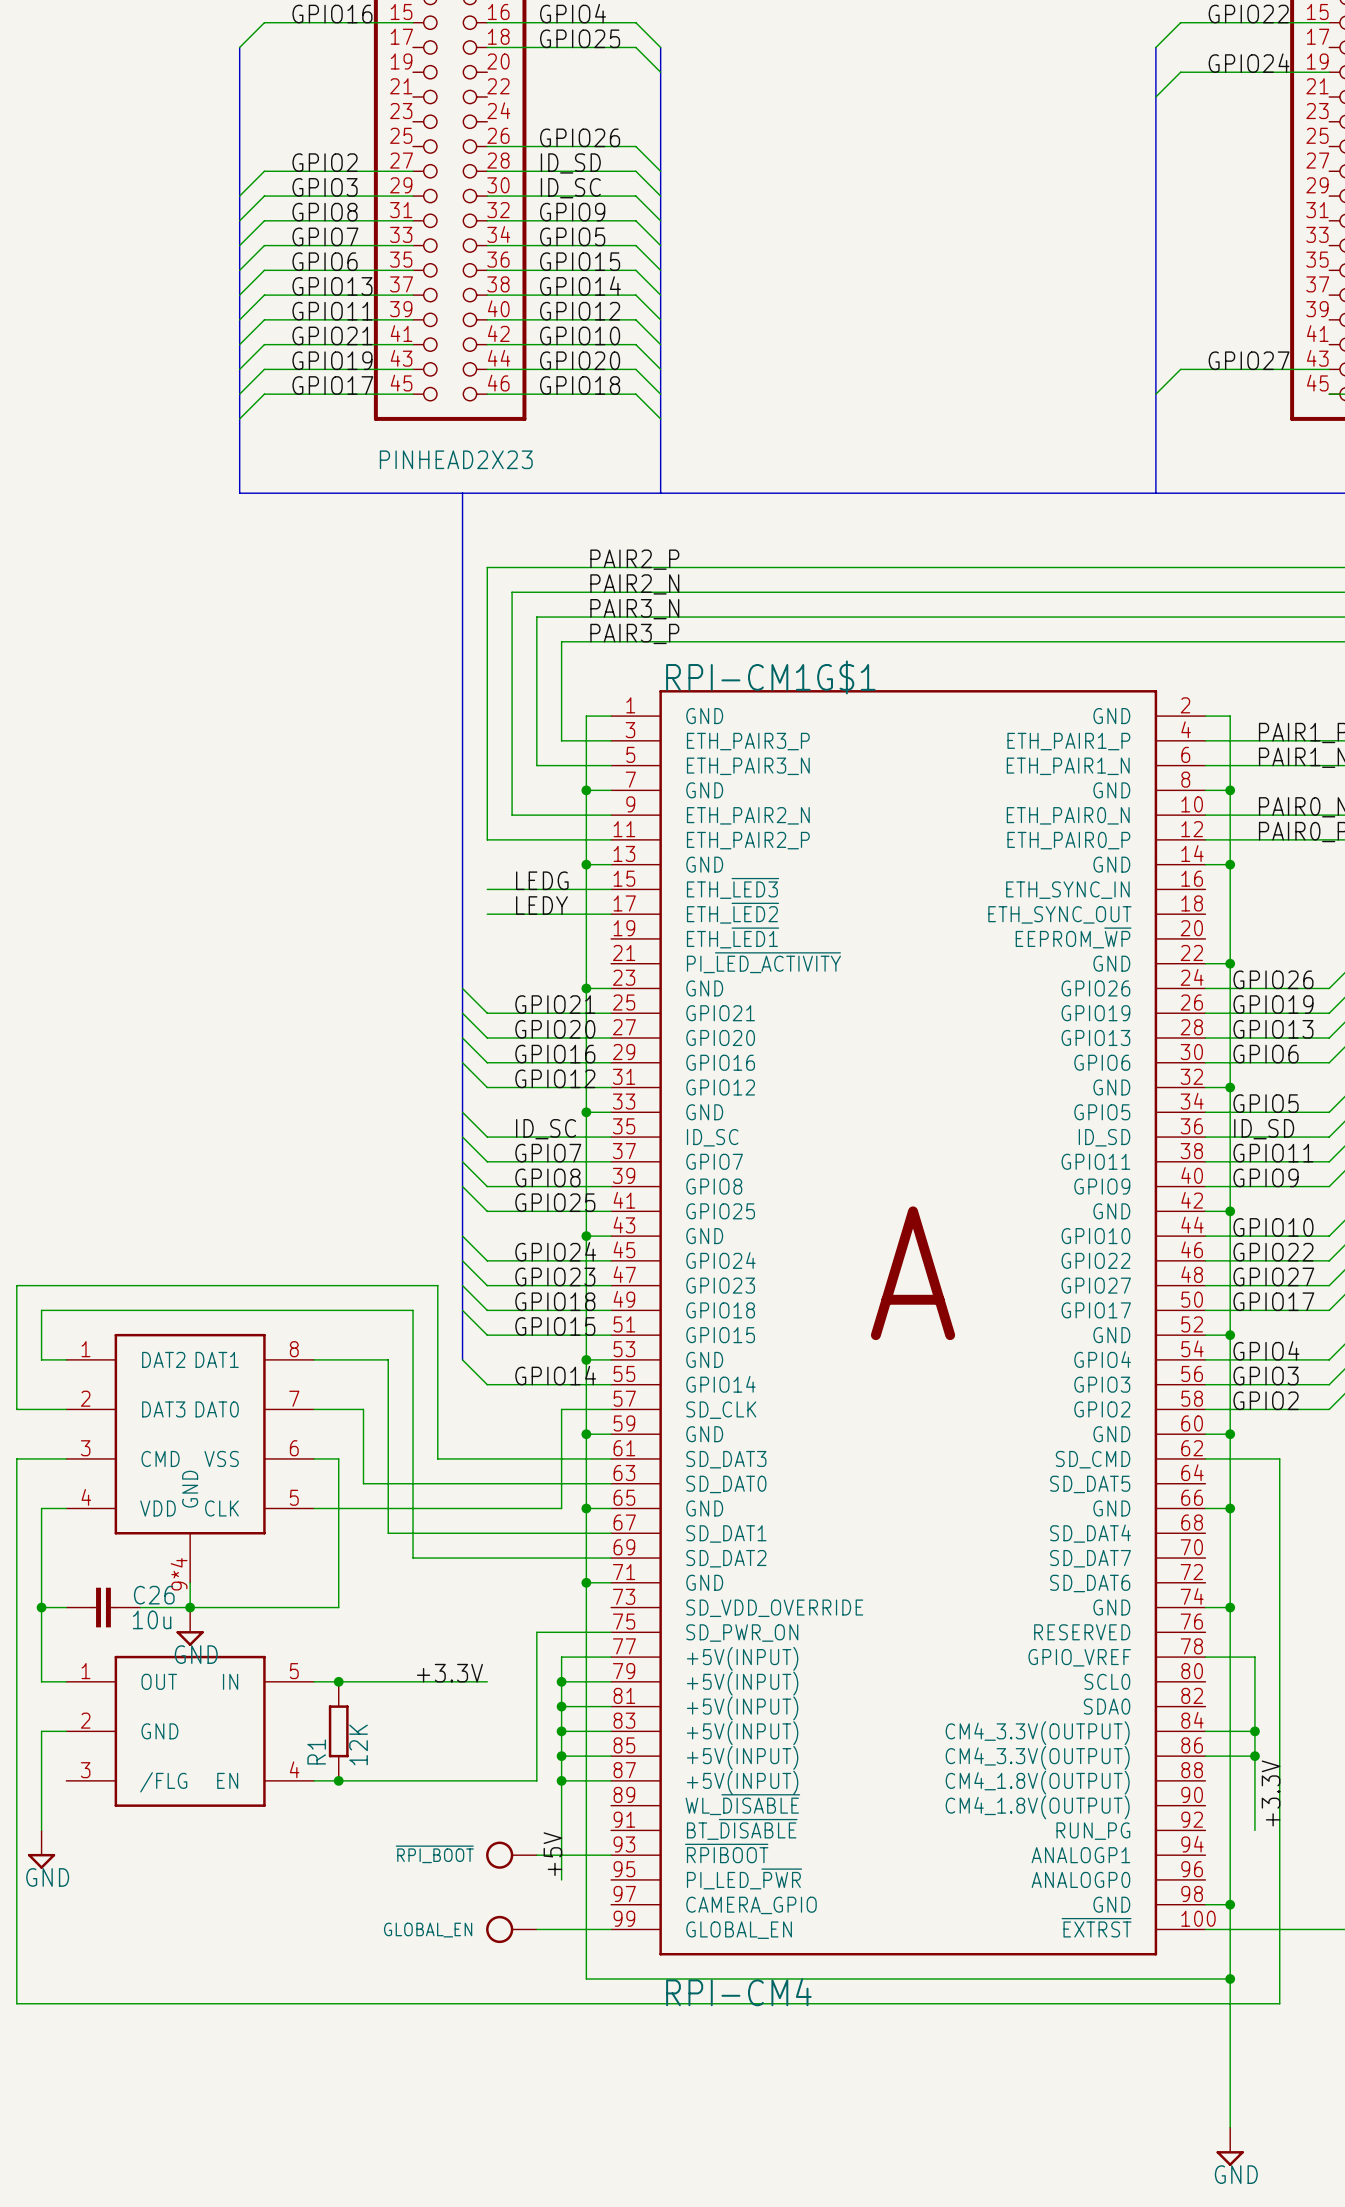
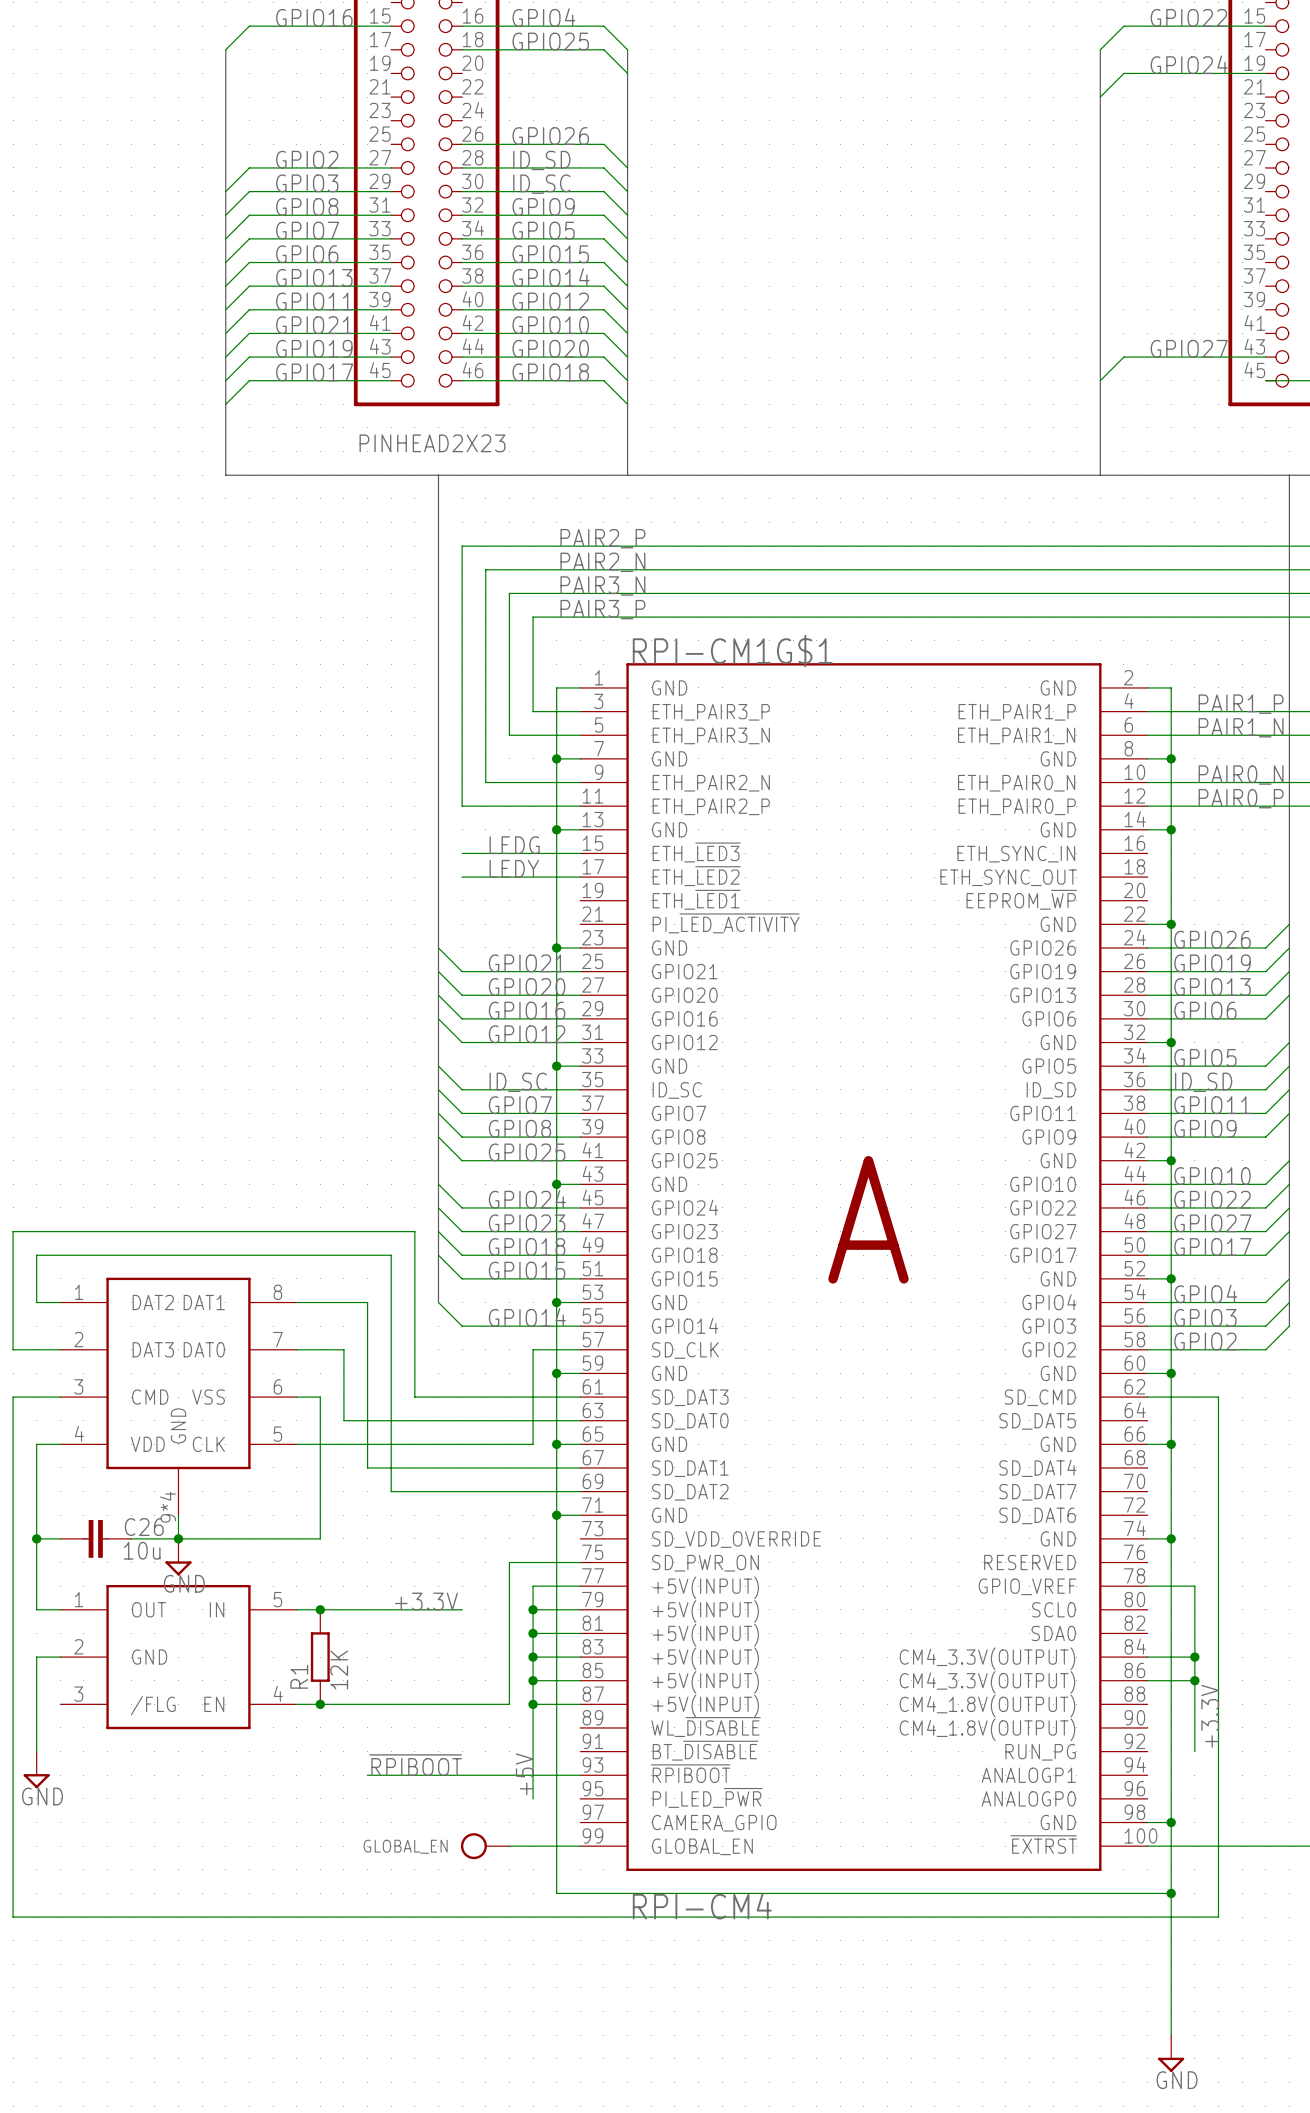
label: none -> ~{RPIBOOT} (415, 1765)
wire: none -> (367, 1775) (509, 1775)
~{RPI_BOOT}: (511, 1855) -> none

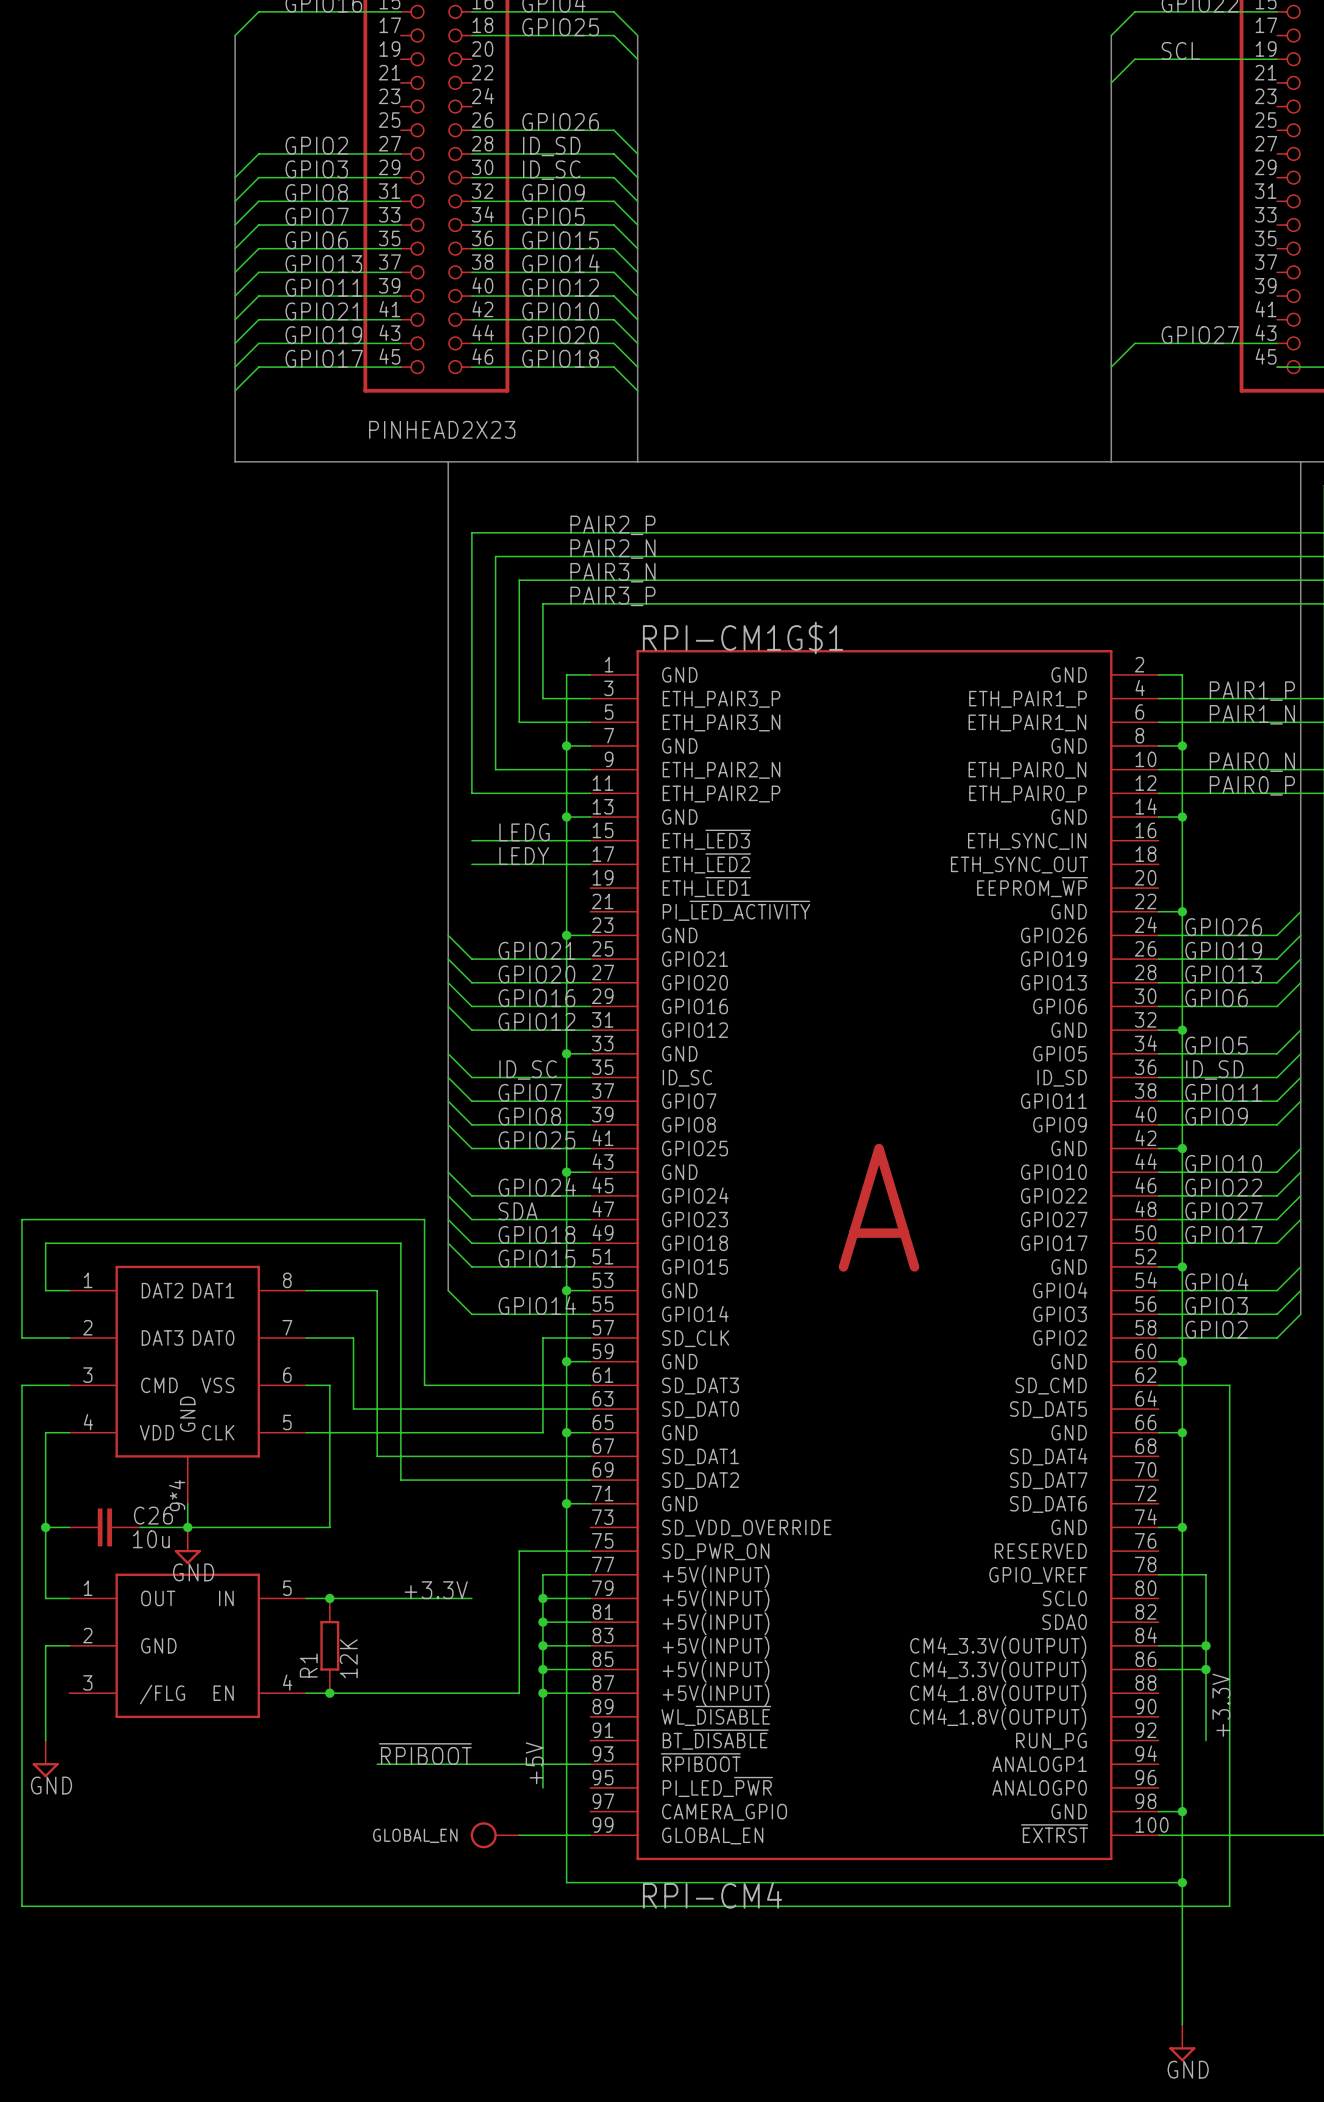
label: GPIO24 (1189, 64) -> SCL (1180, 50)
label: GPIO23 (527, 1223) -> SDA (518, 1211)

